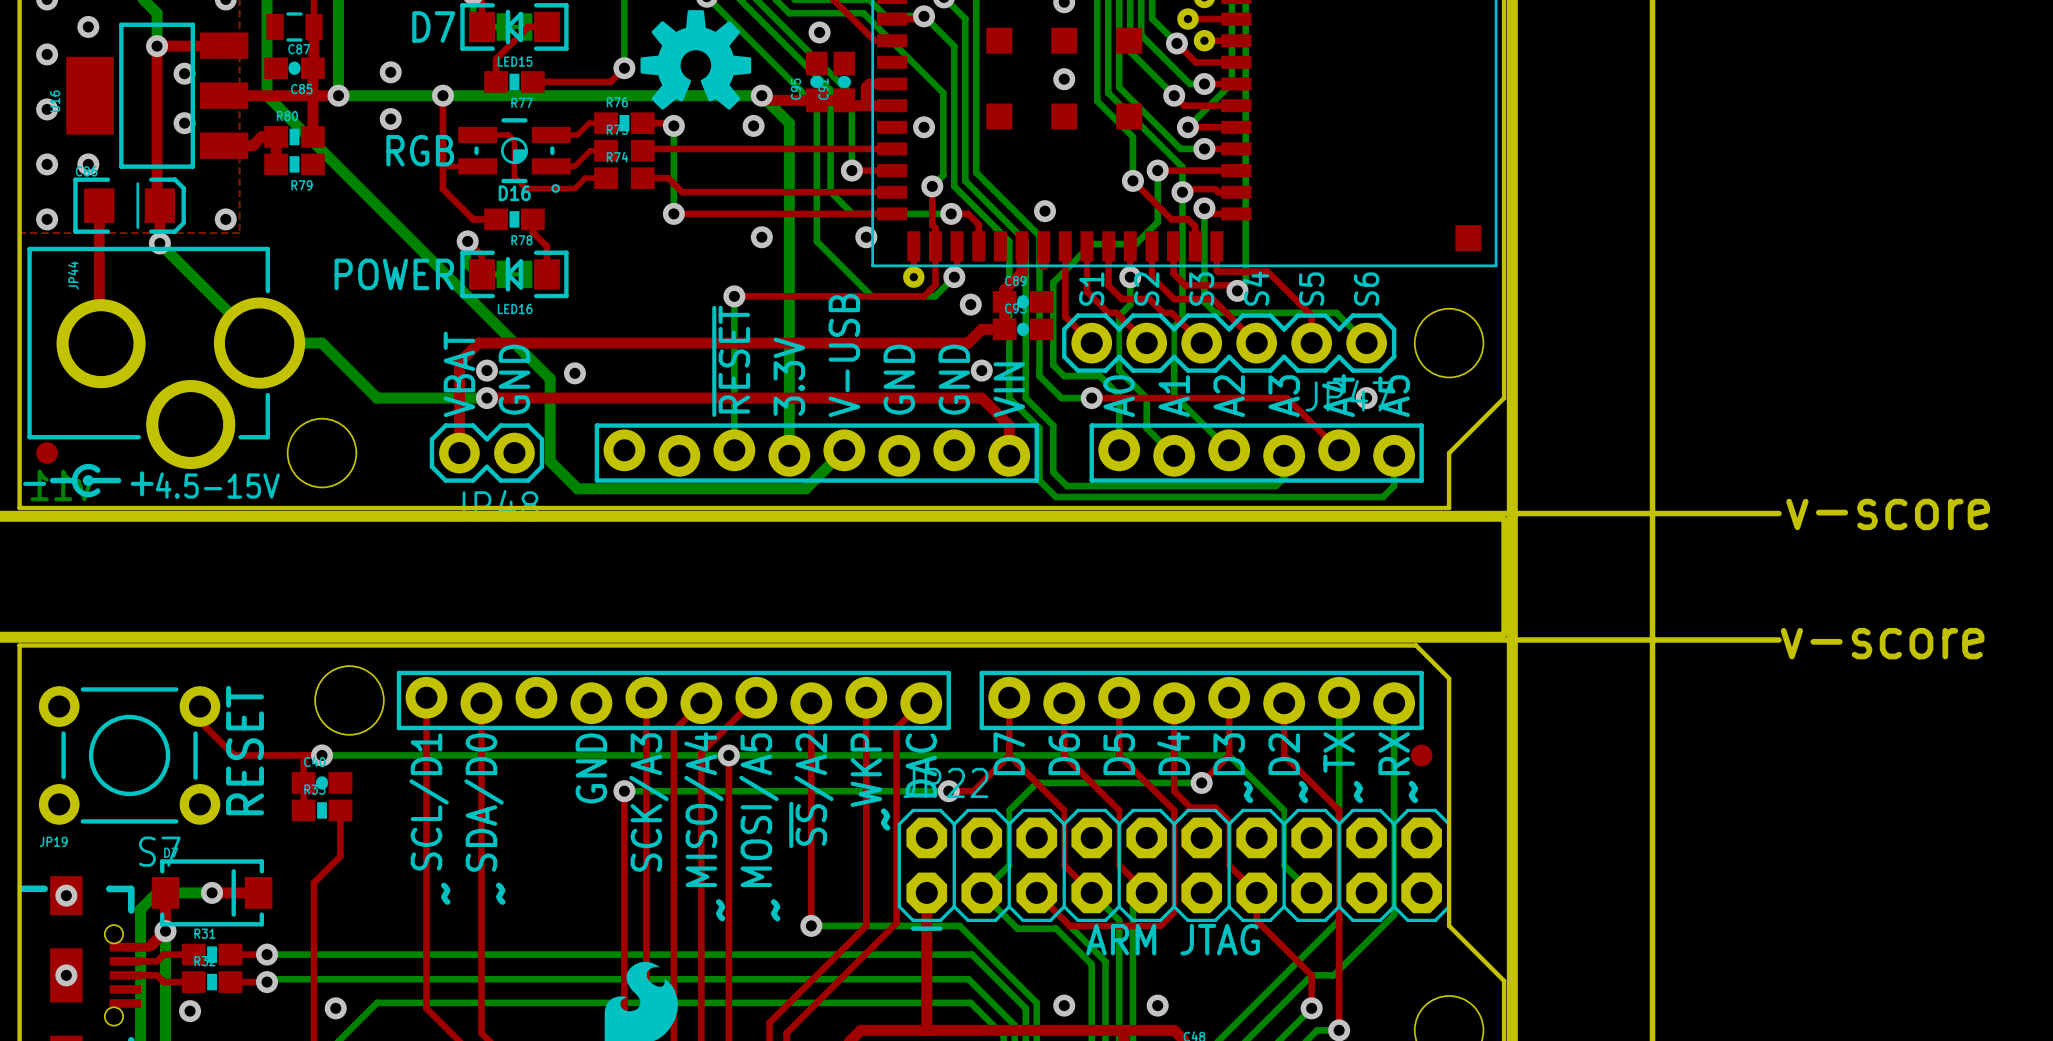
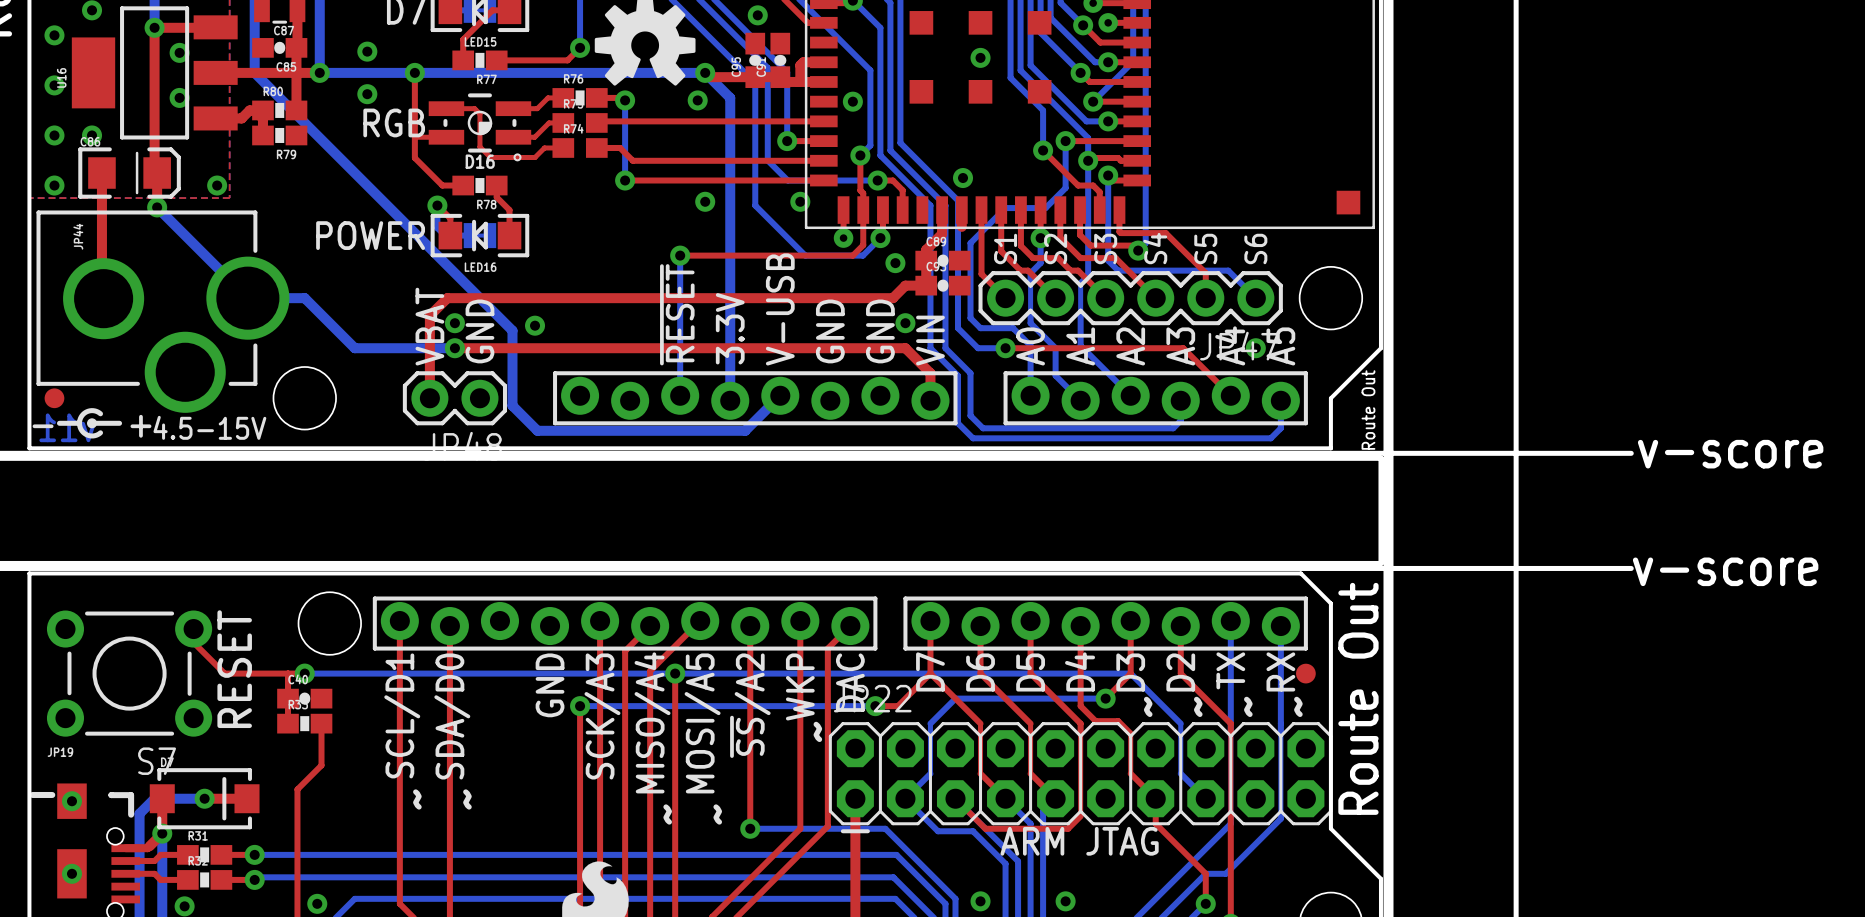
text: none -> Route Out (1368, 410)
text: none -> Route Out (1358, 698)

